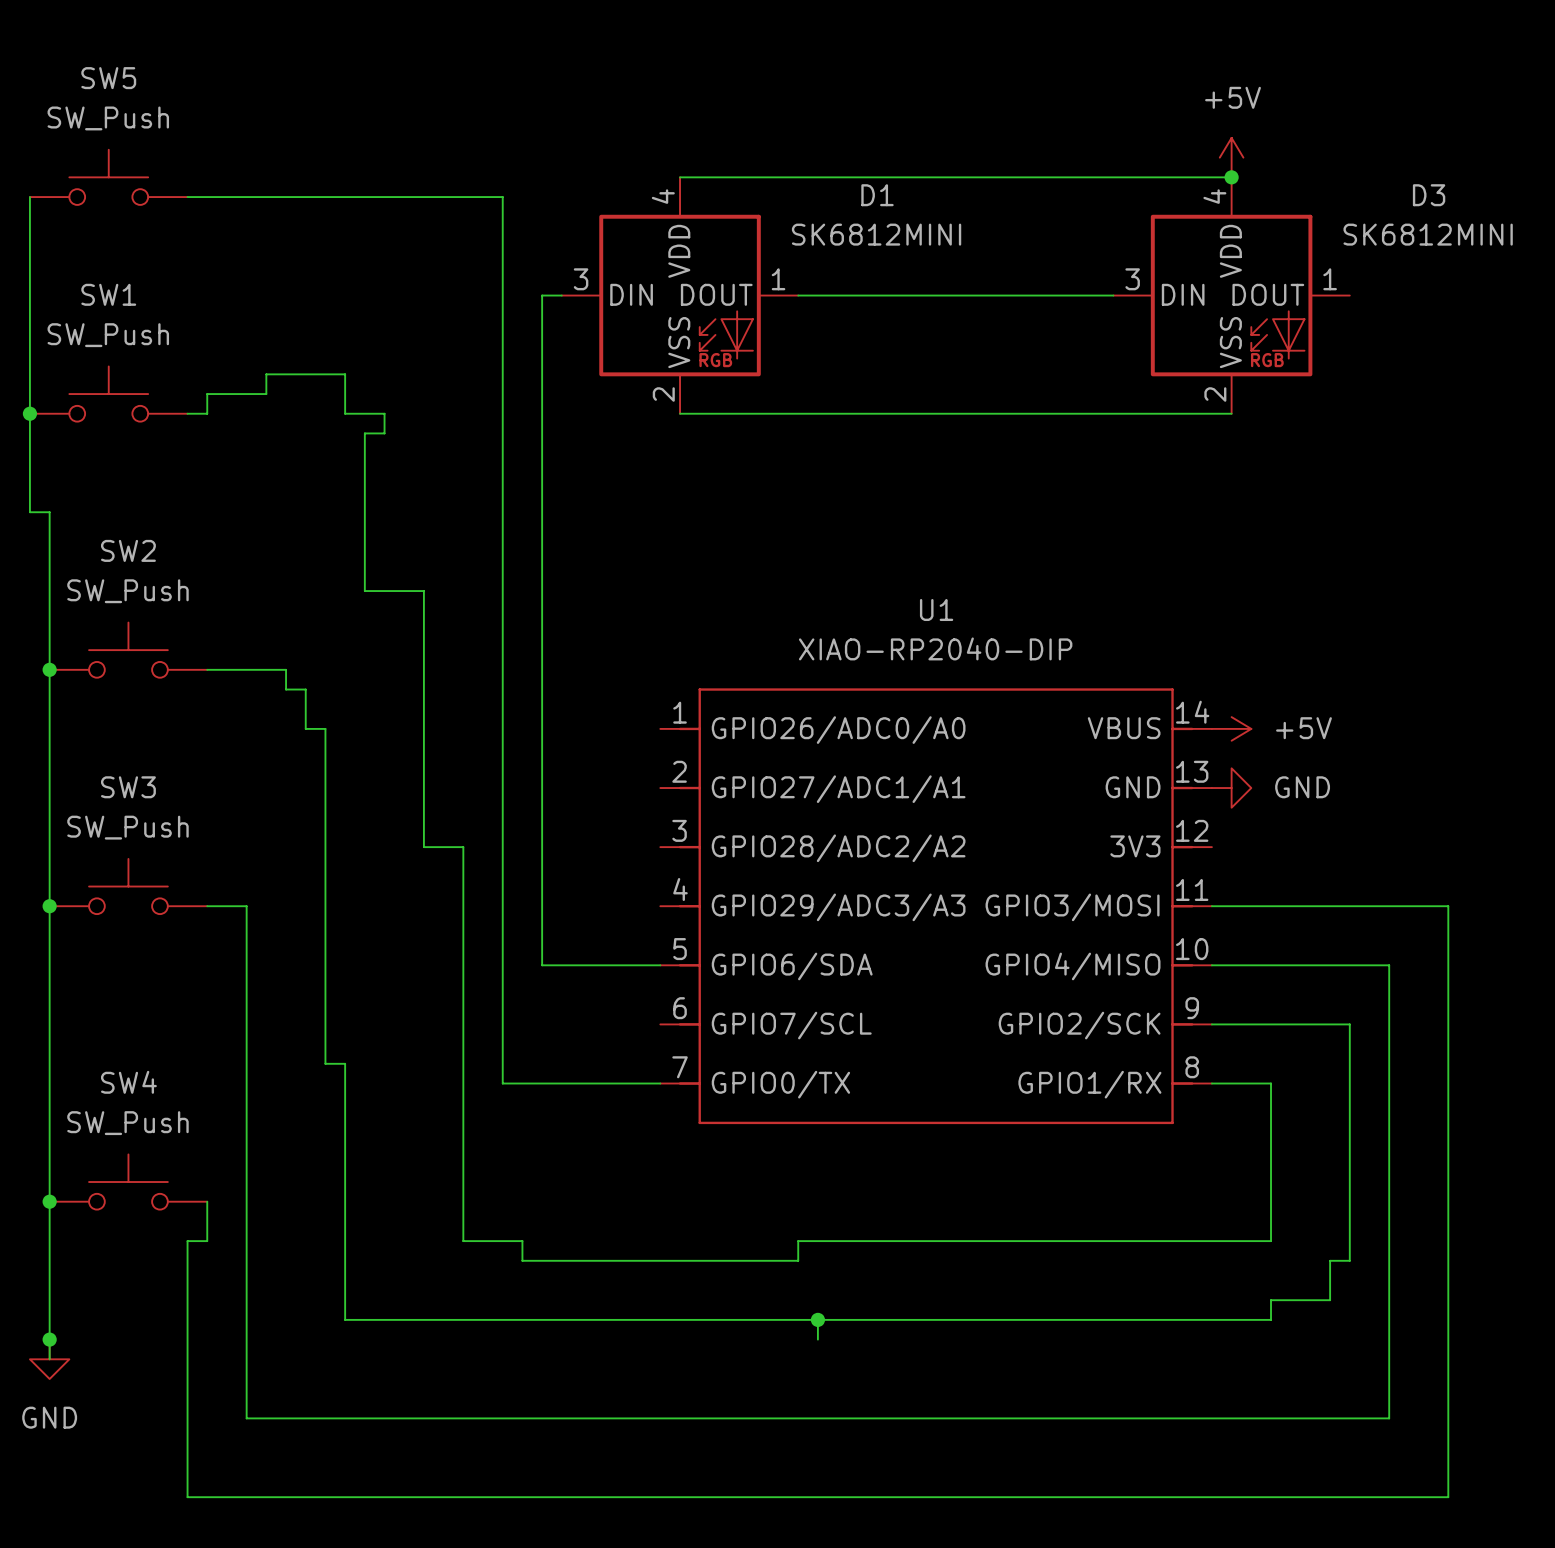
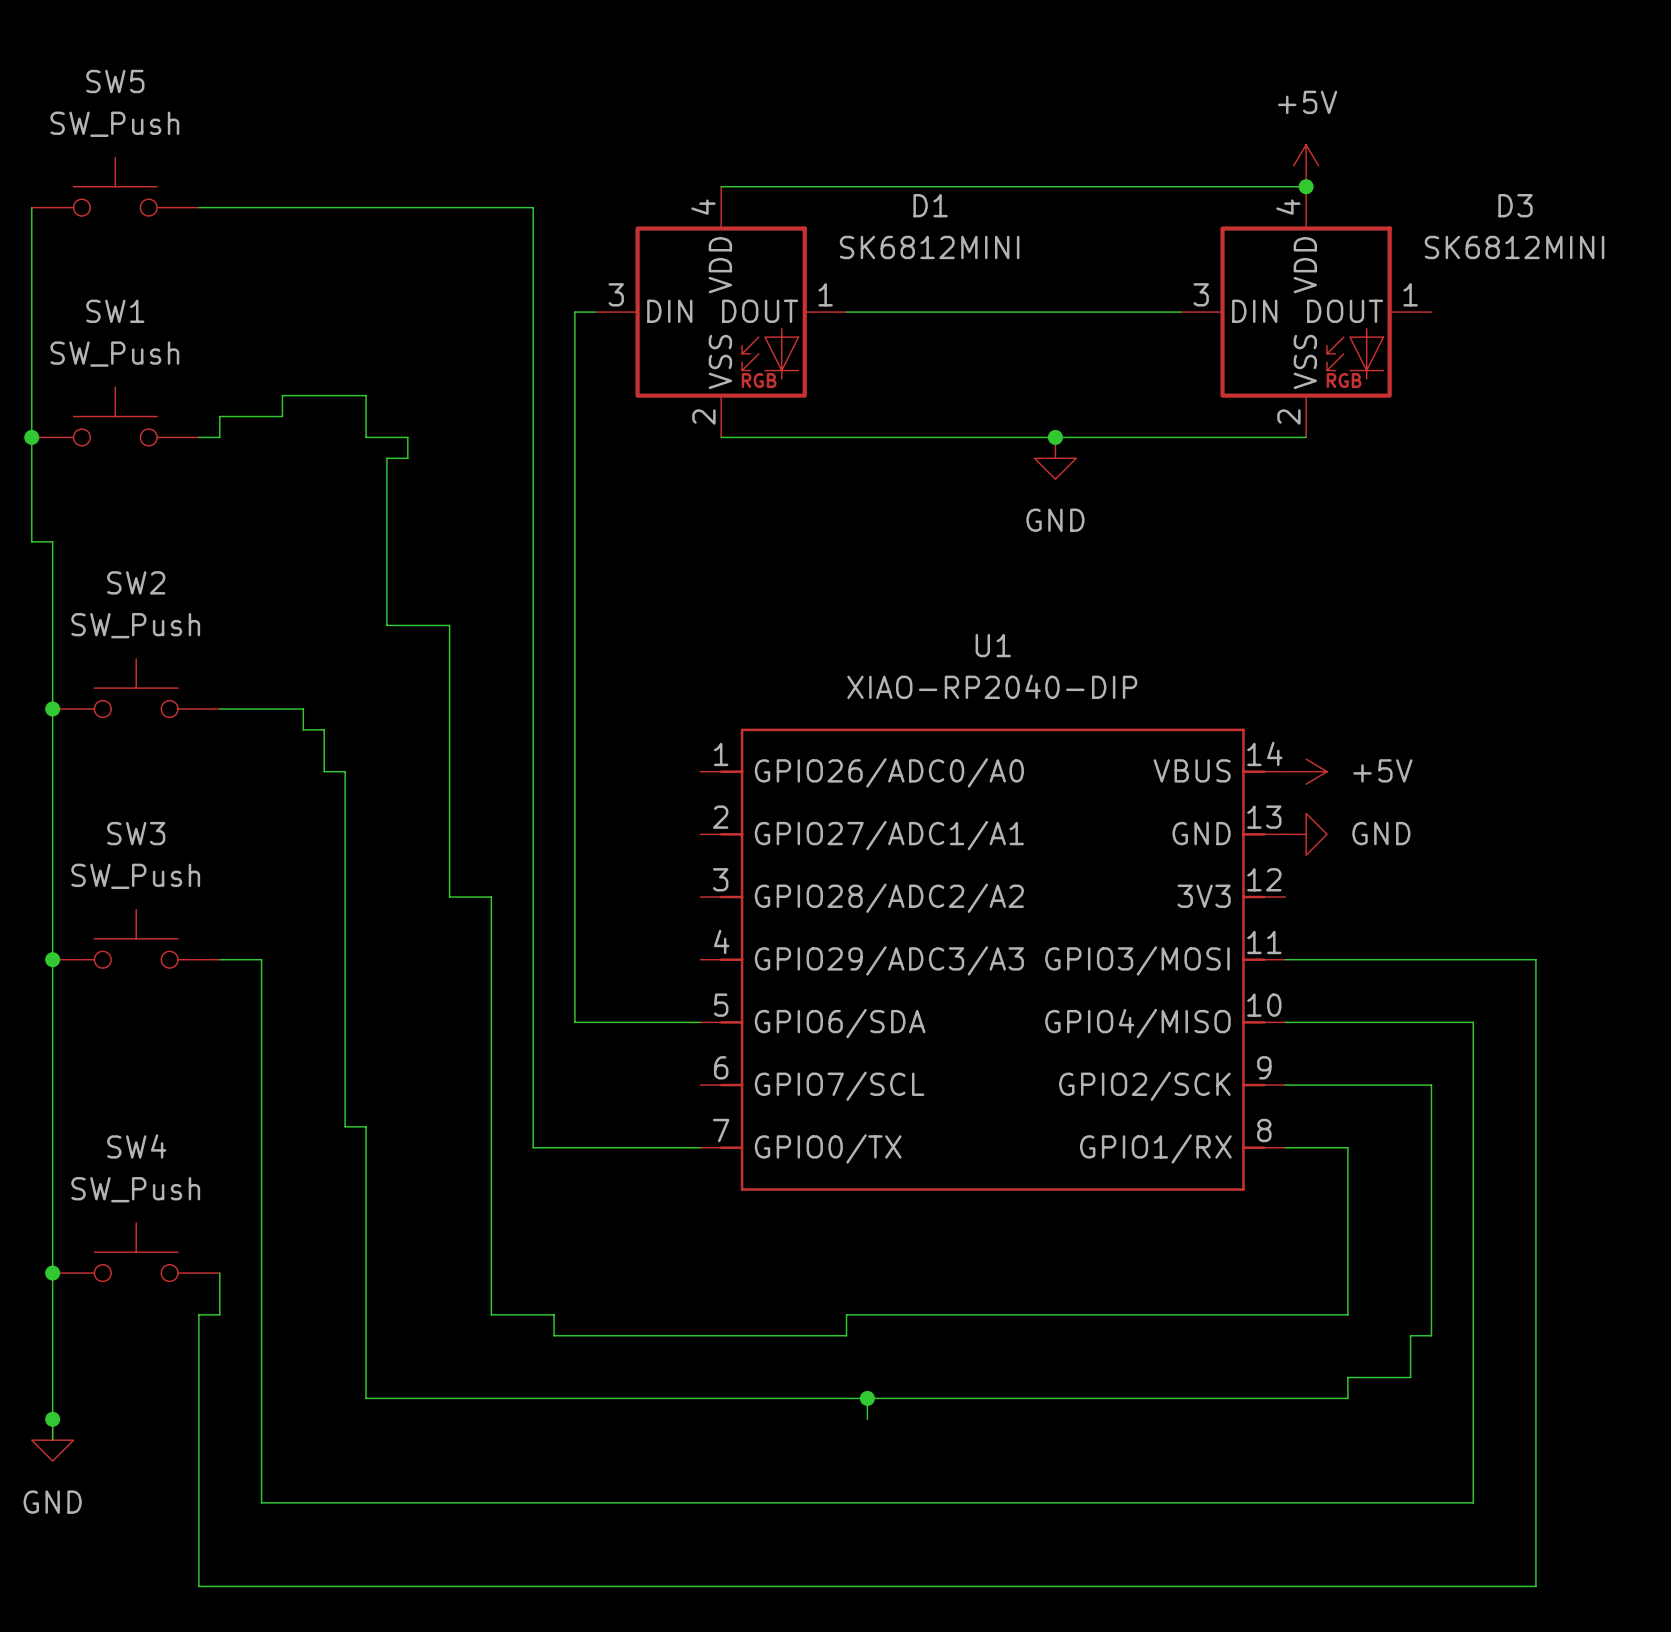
junction: none -> (1055, 437)
power symbol: none -> GND (1055, 458)

